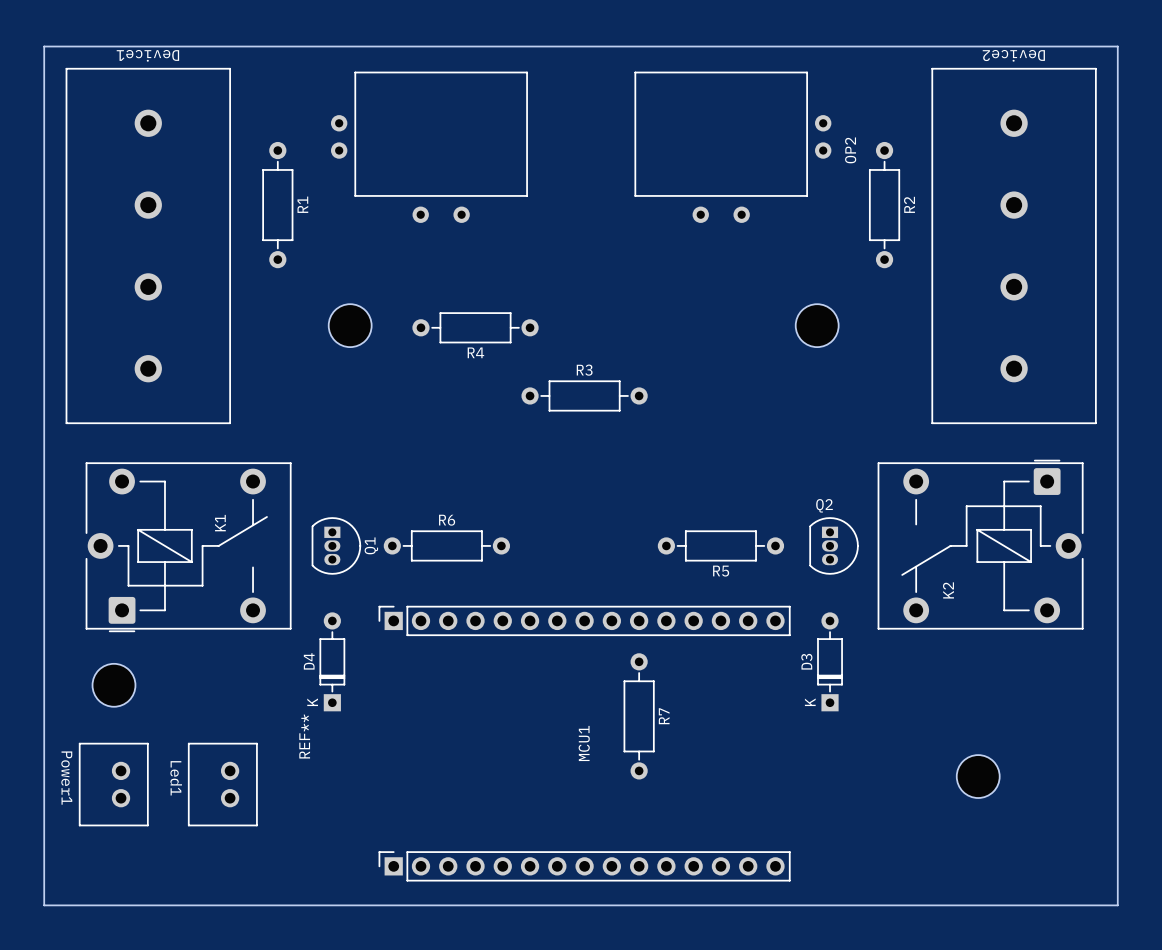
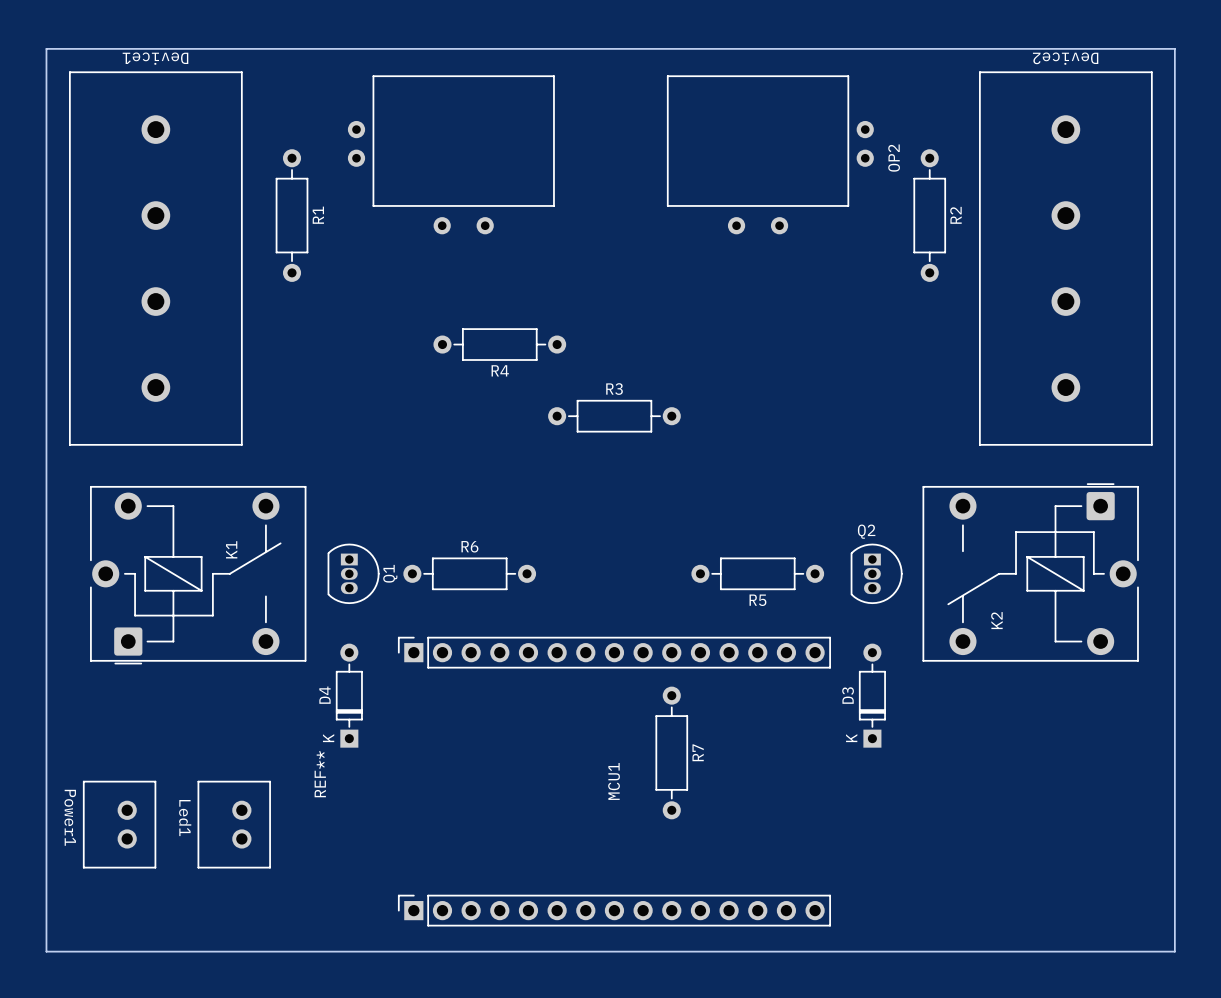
part: (350, 325) -> none
part: (817, 325) -> none
part: (113, 685) -> none
part: (978, 776) -> none

